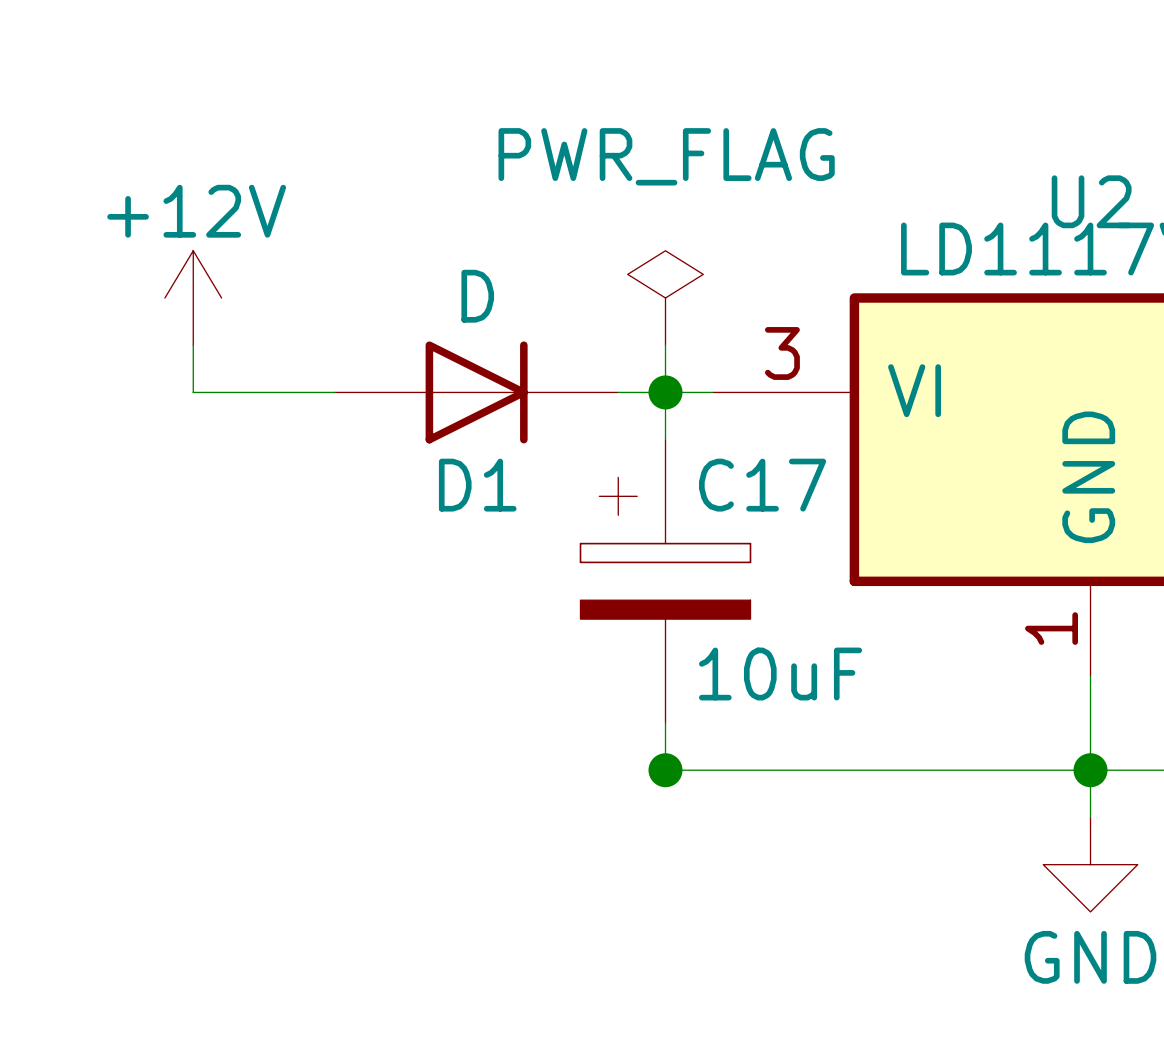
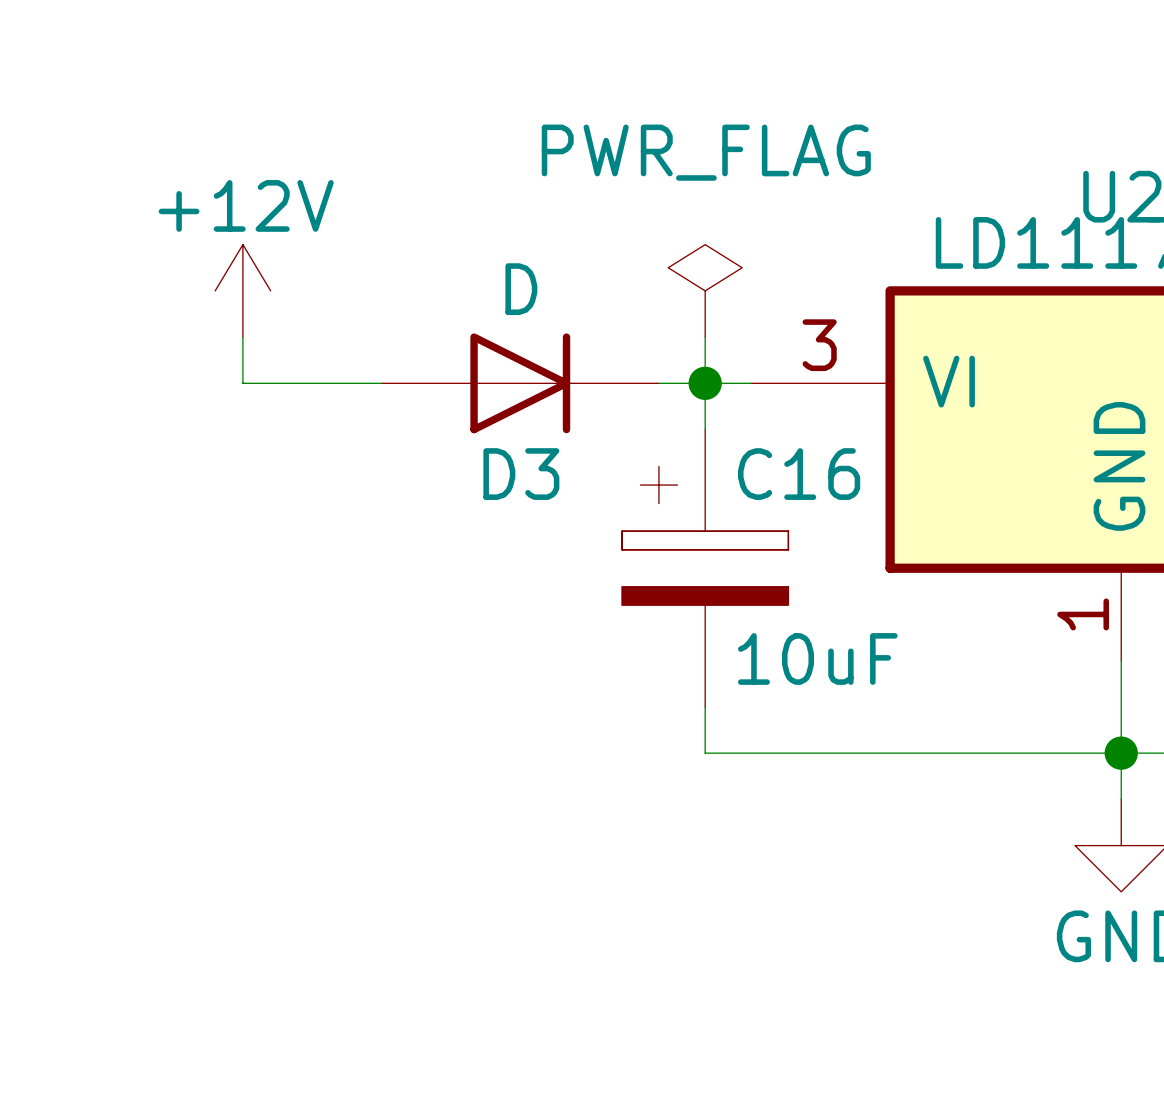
D1 name: D1 (477, 485) -> D3 (521, 474)
C17 name: C17 (762, 485) -> C16 (799, 474)
junction: (665, 770) -> none

